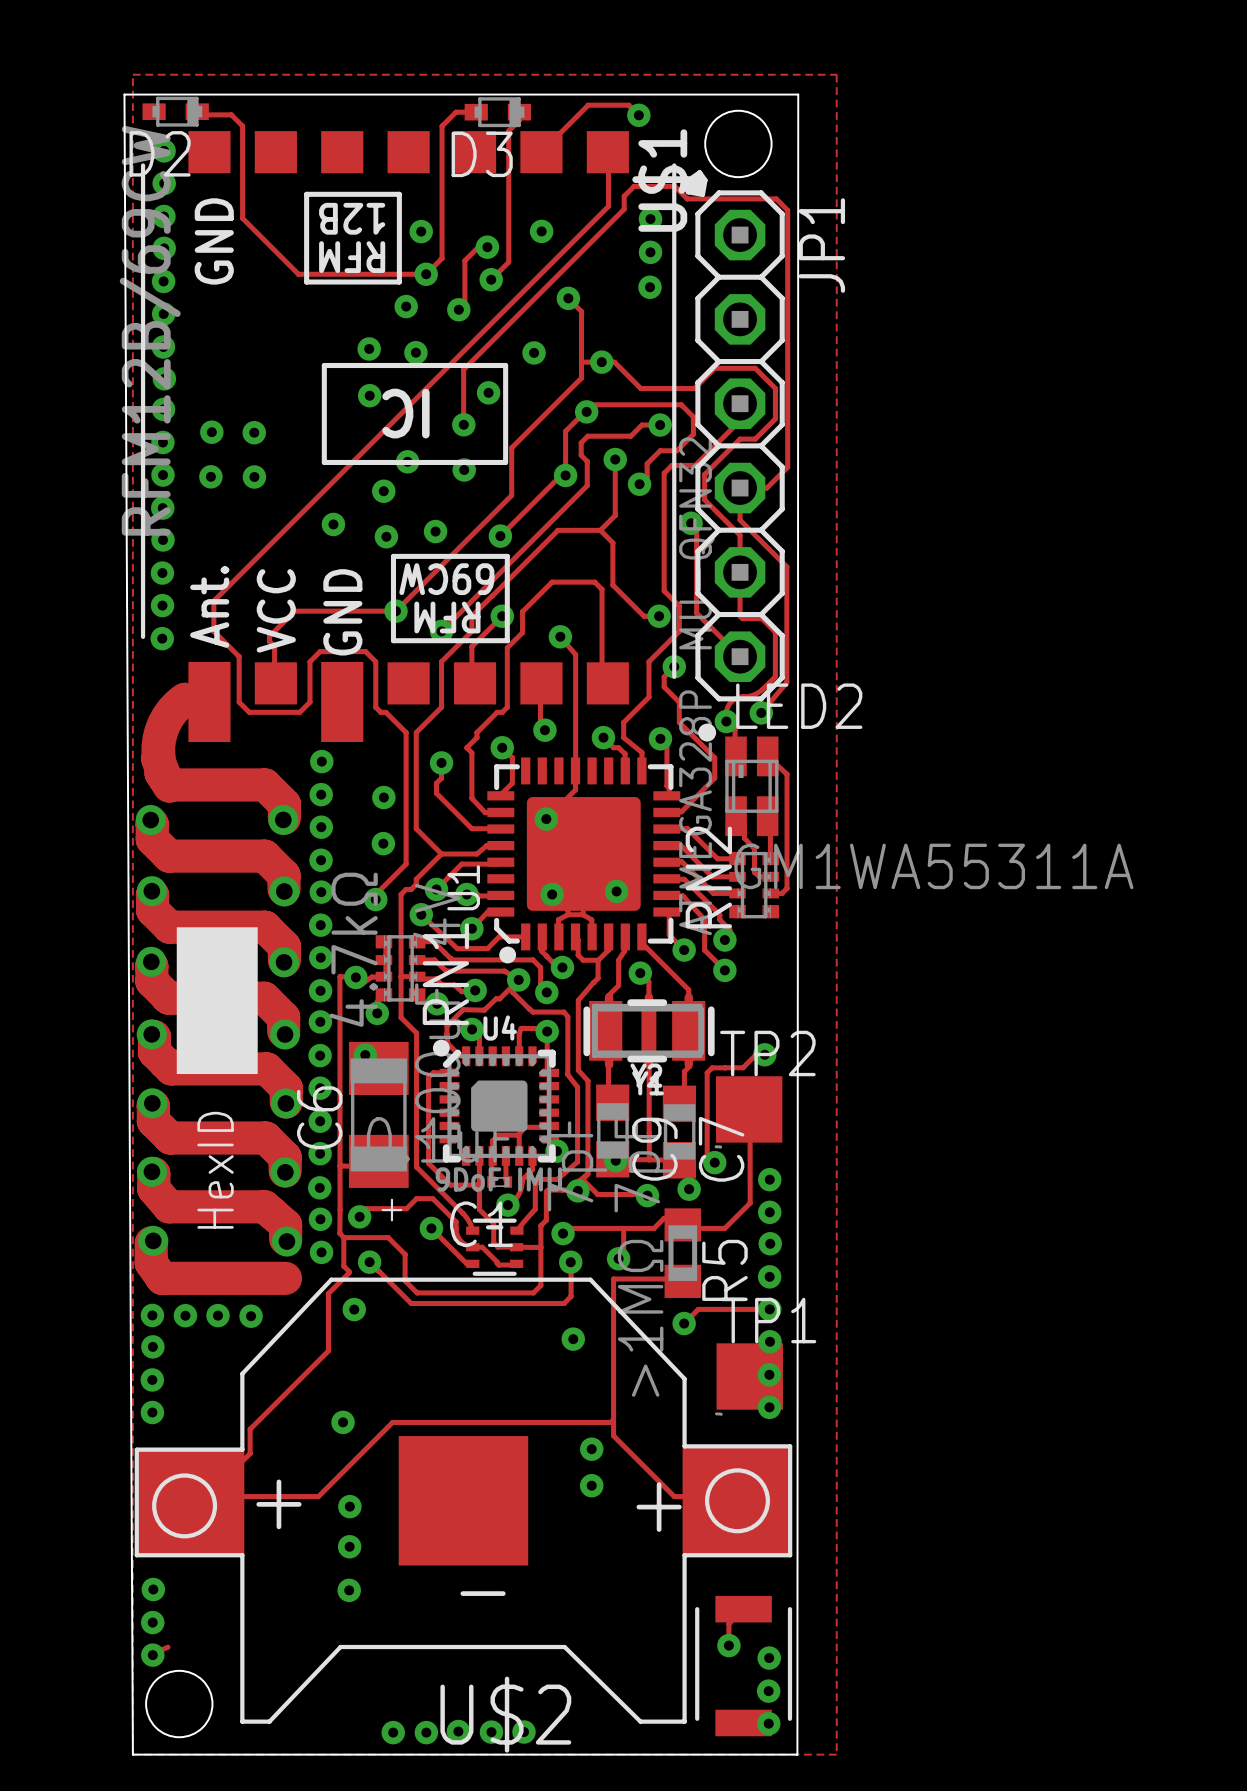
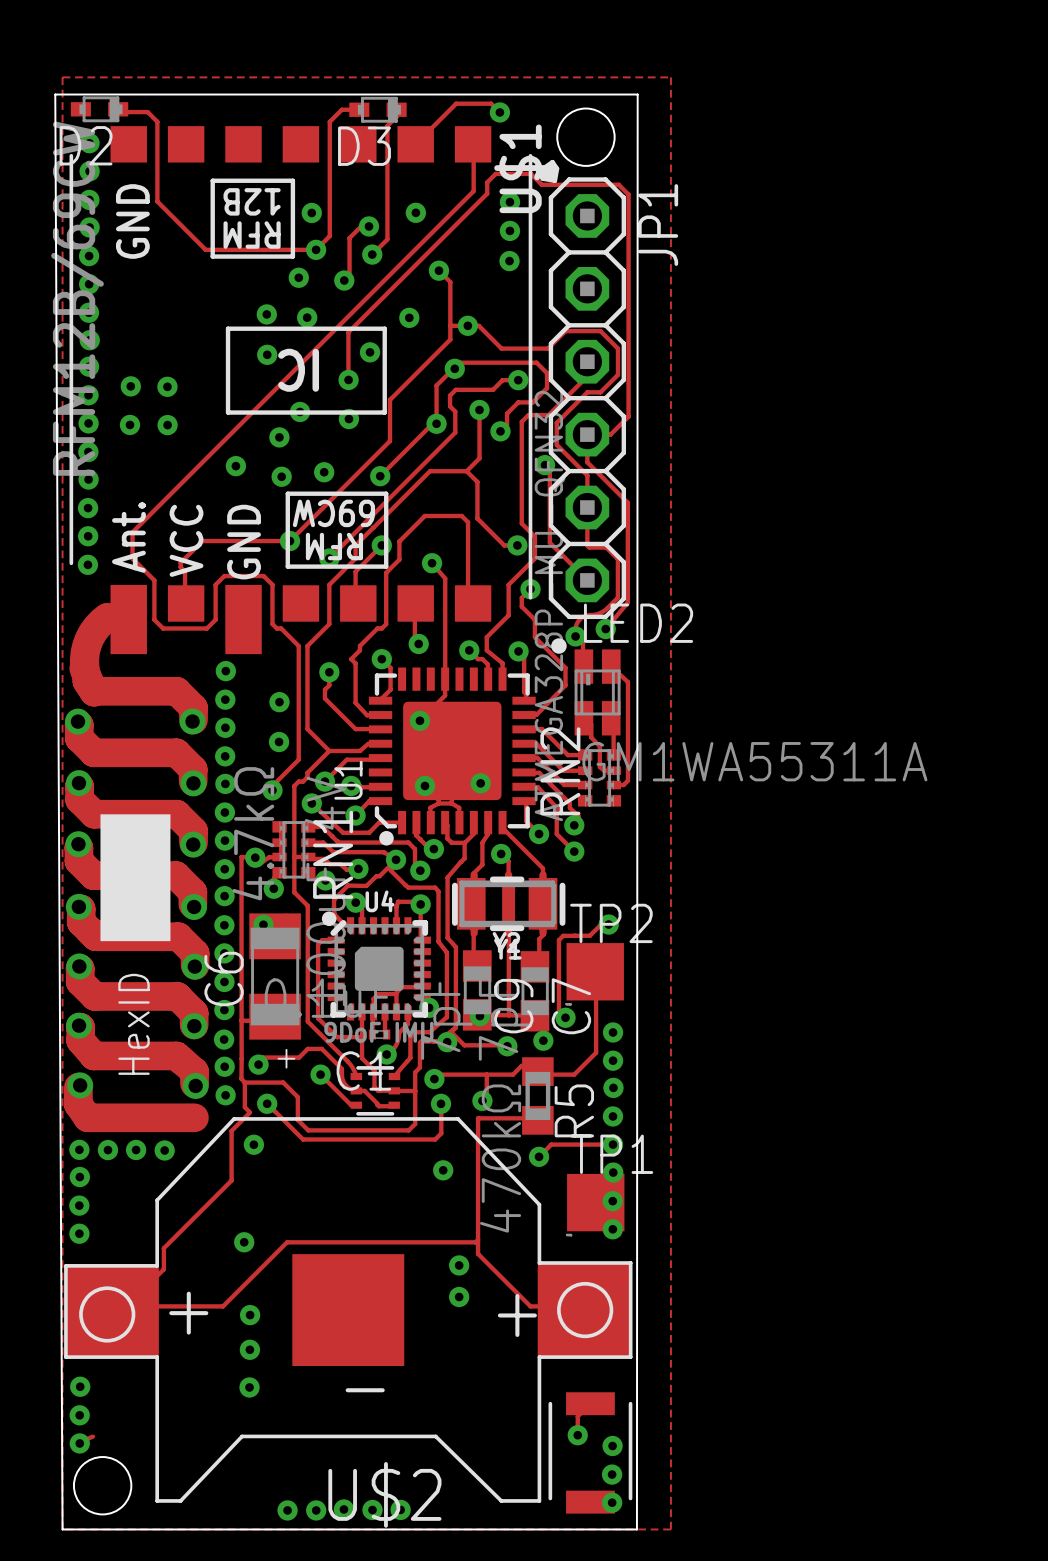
R5 value: >1MΩ (640, 1318) -> 470kΩ (500, 1158)

